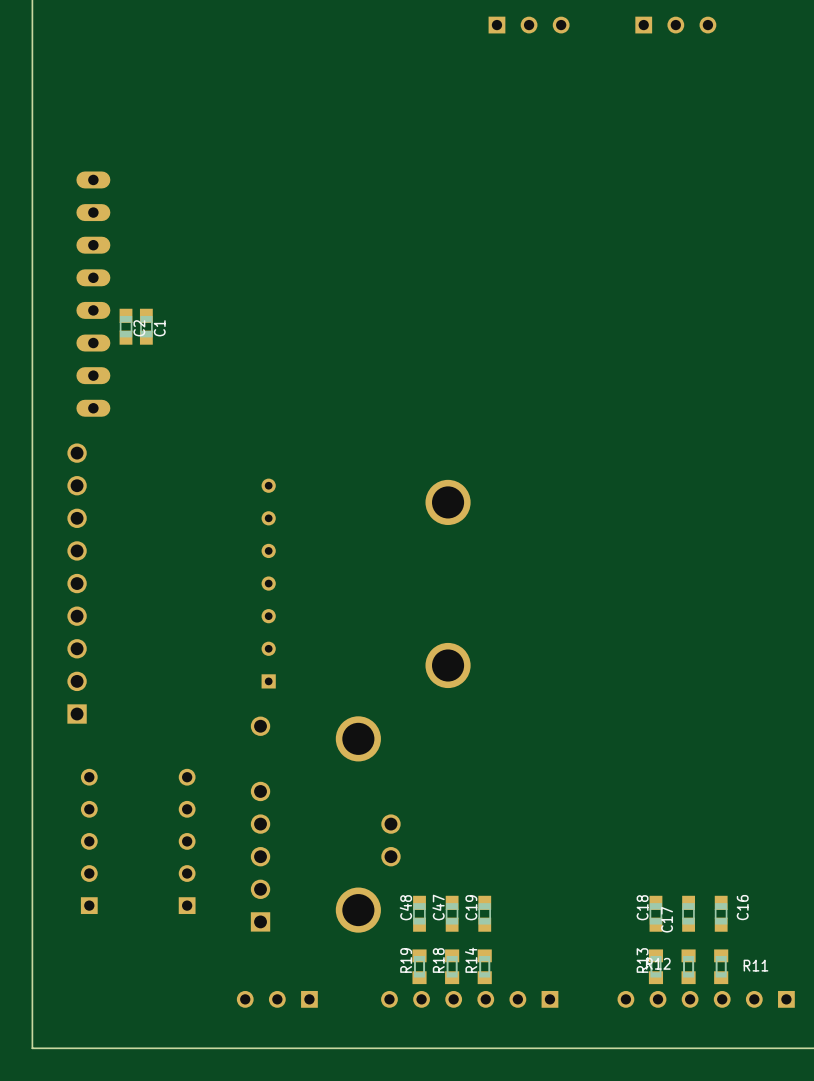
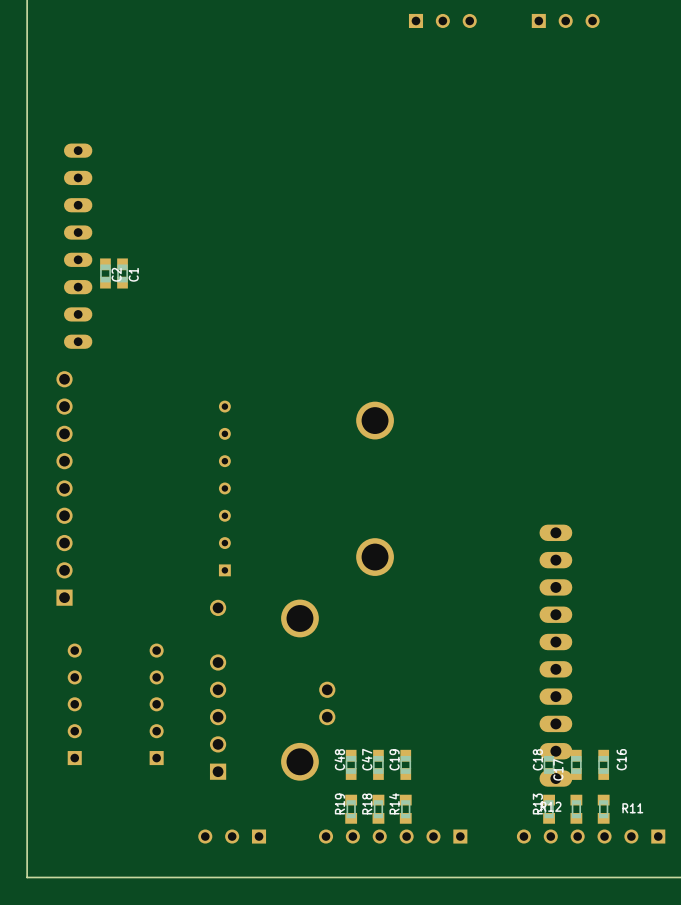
part: none -> (555, 655)

